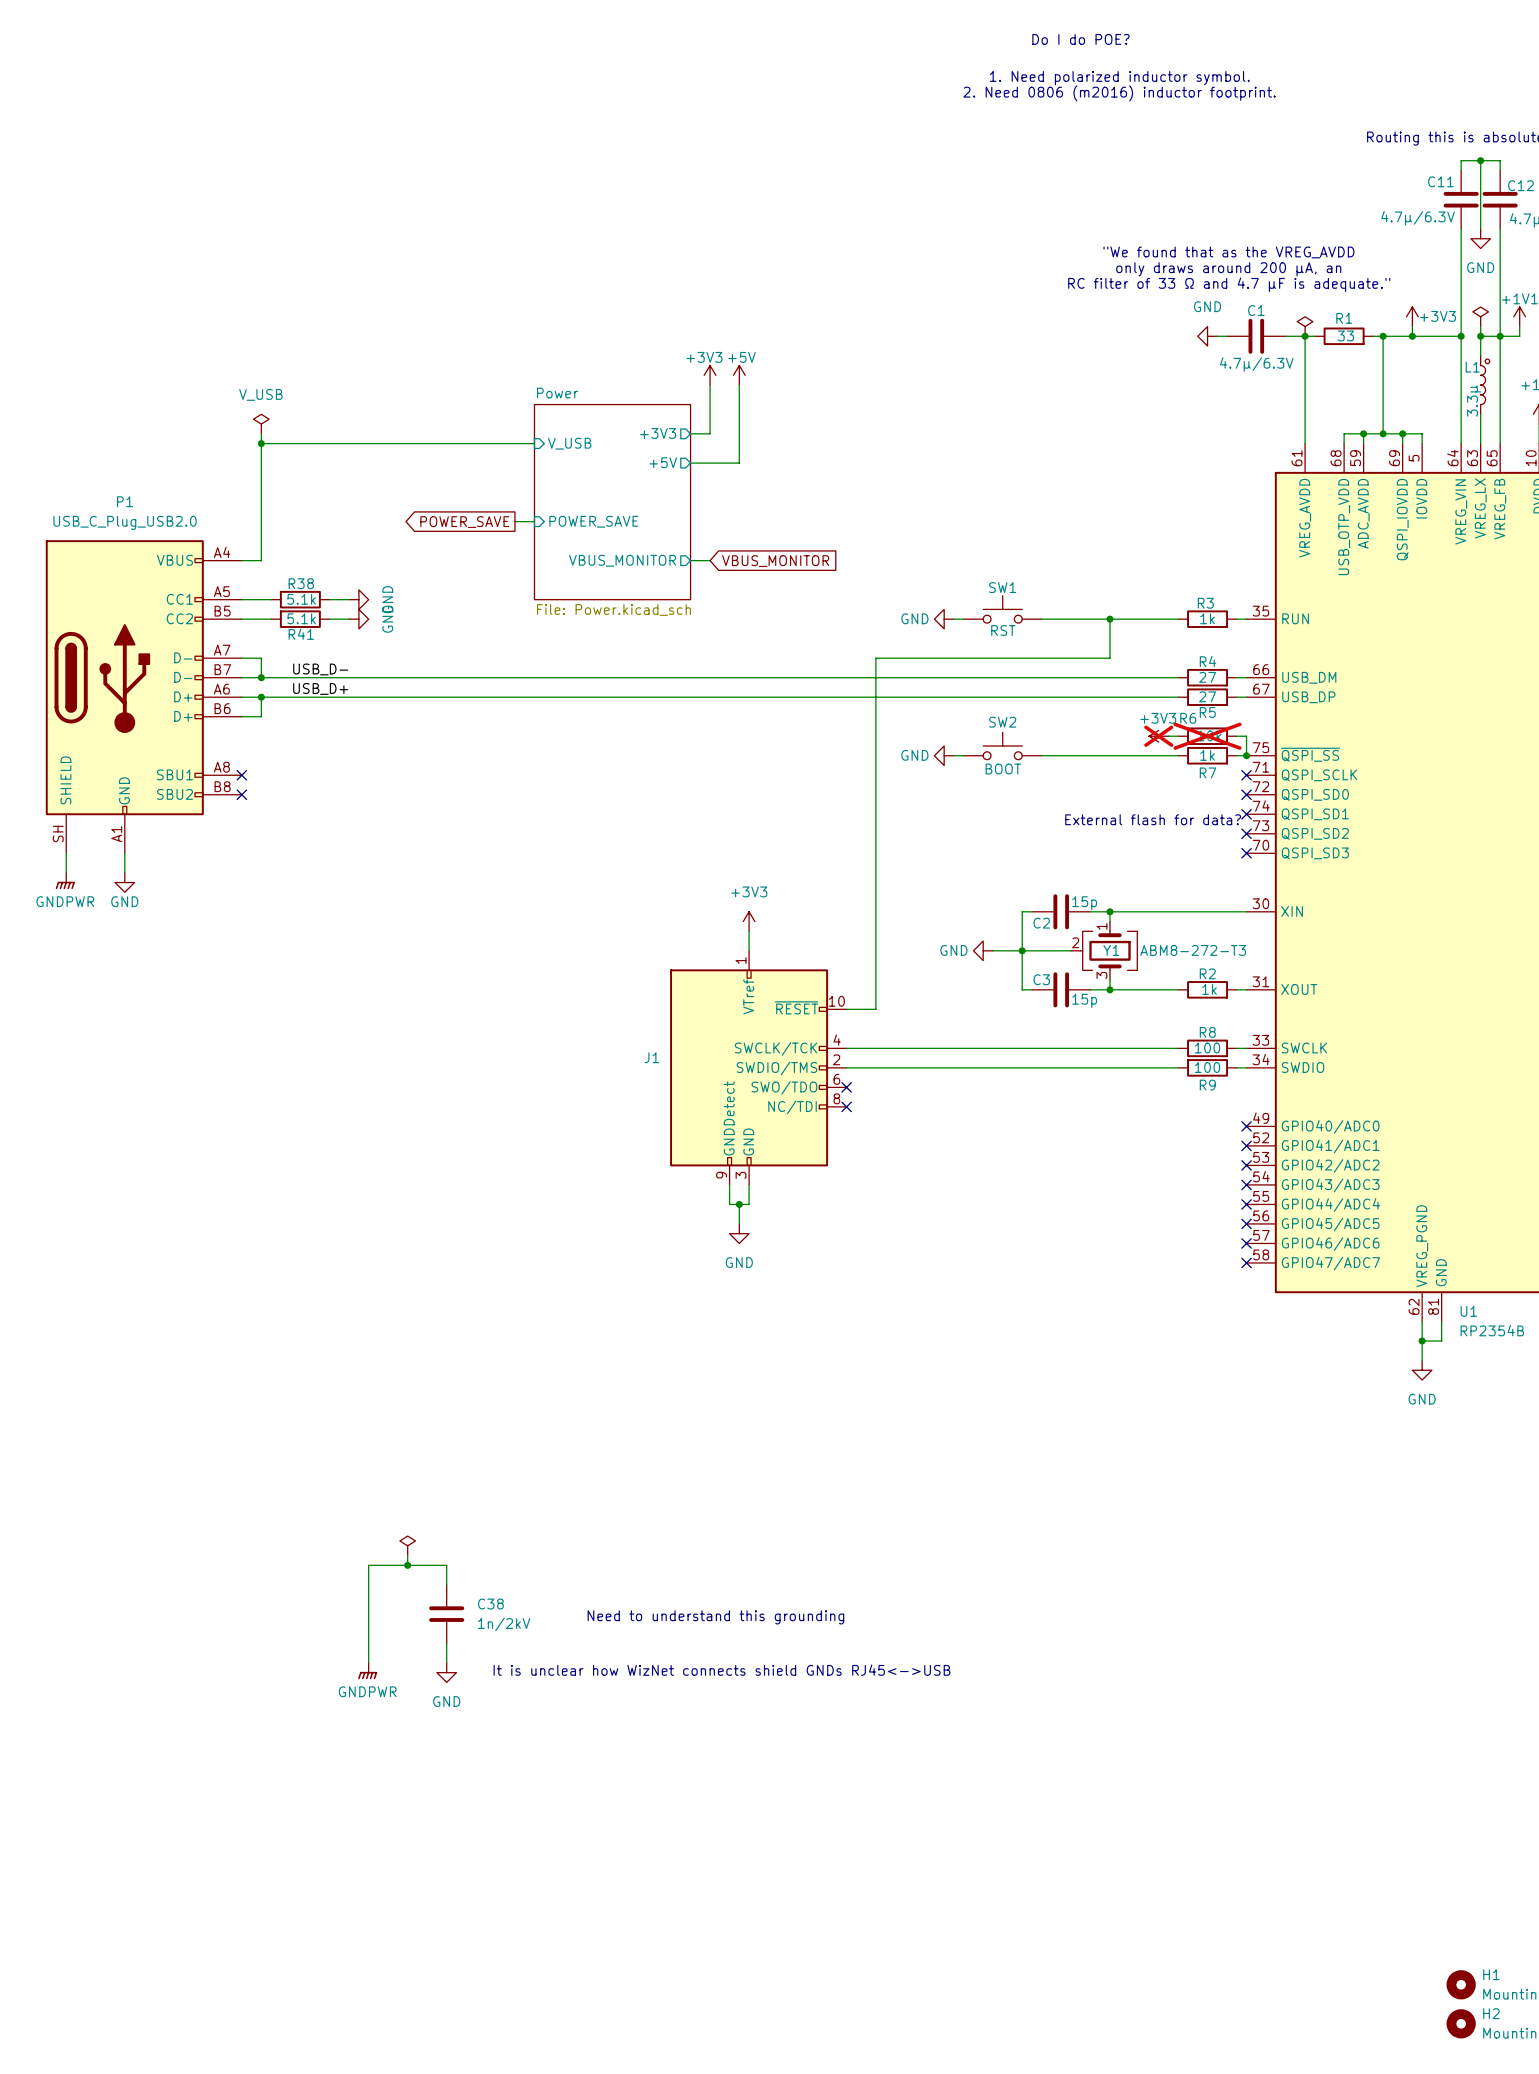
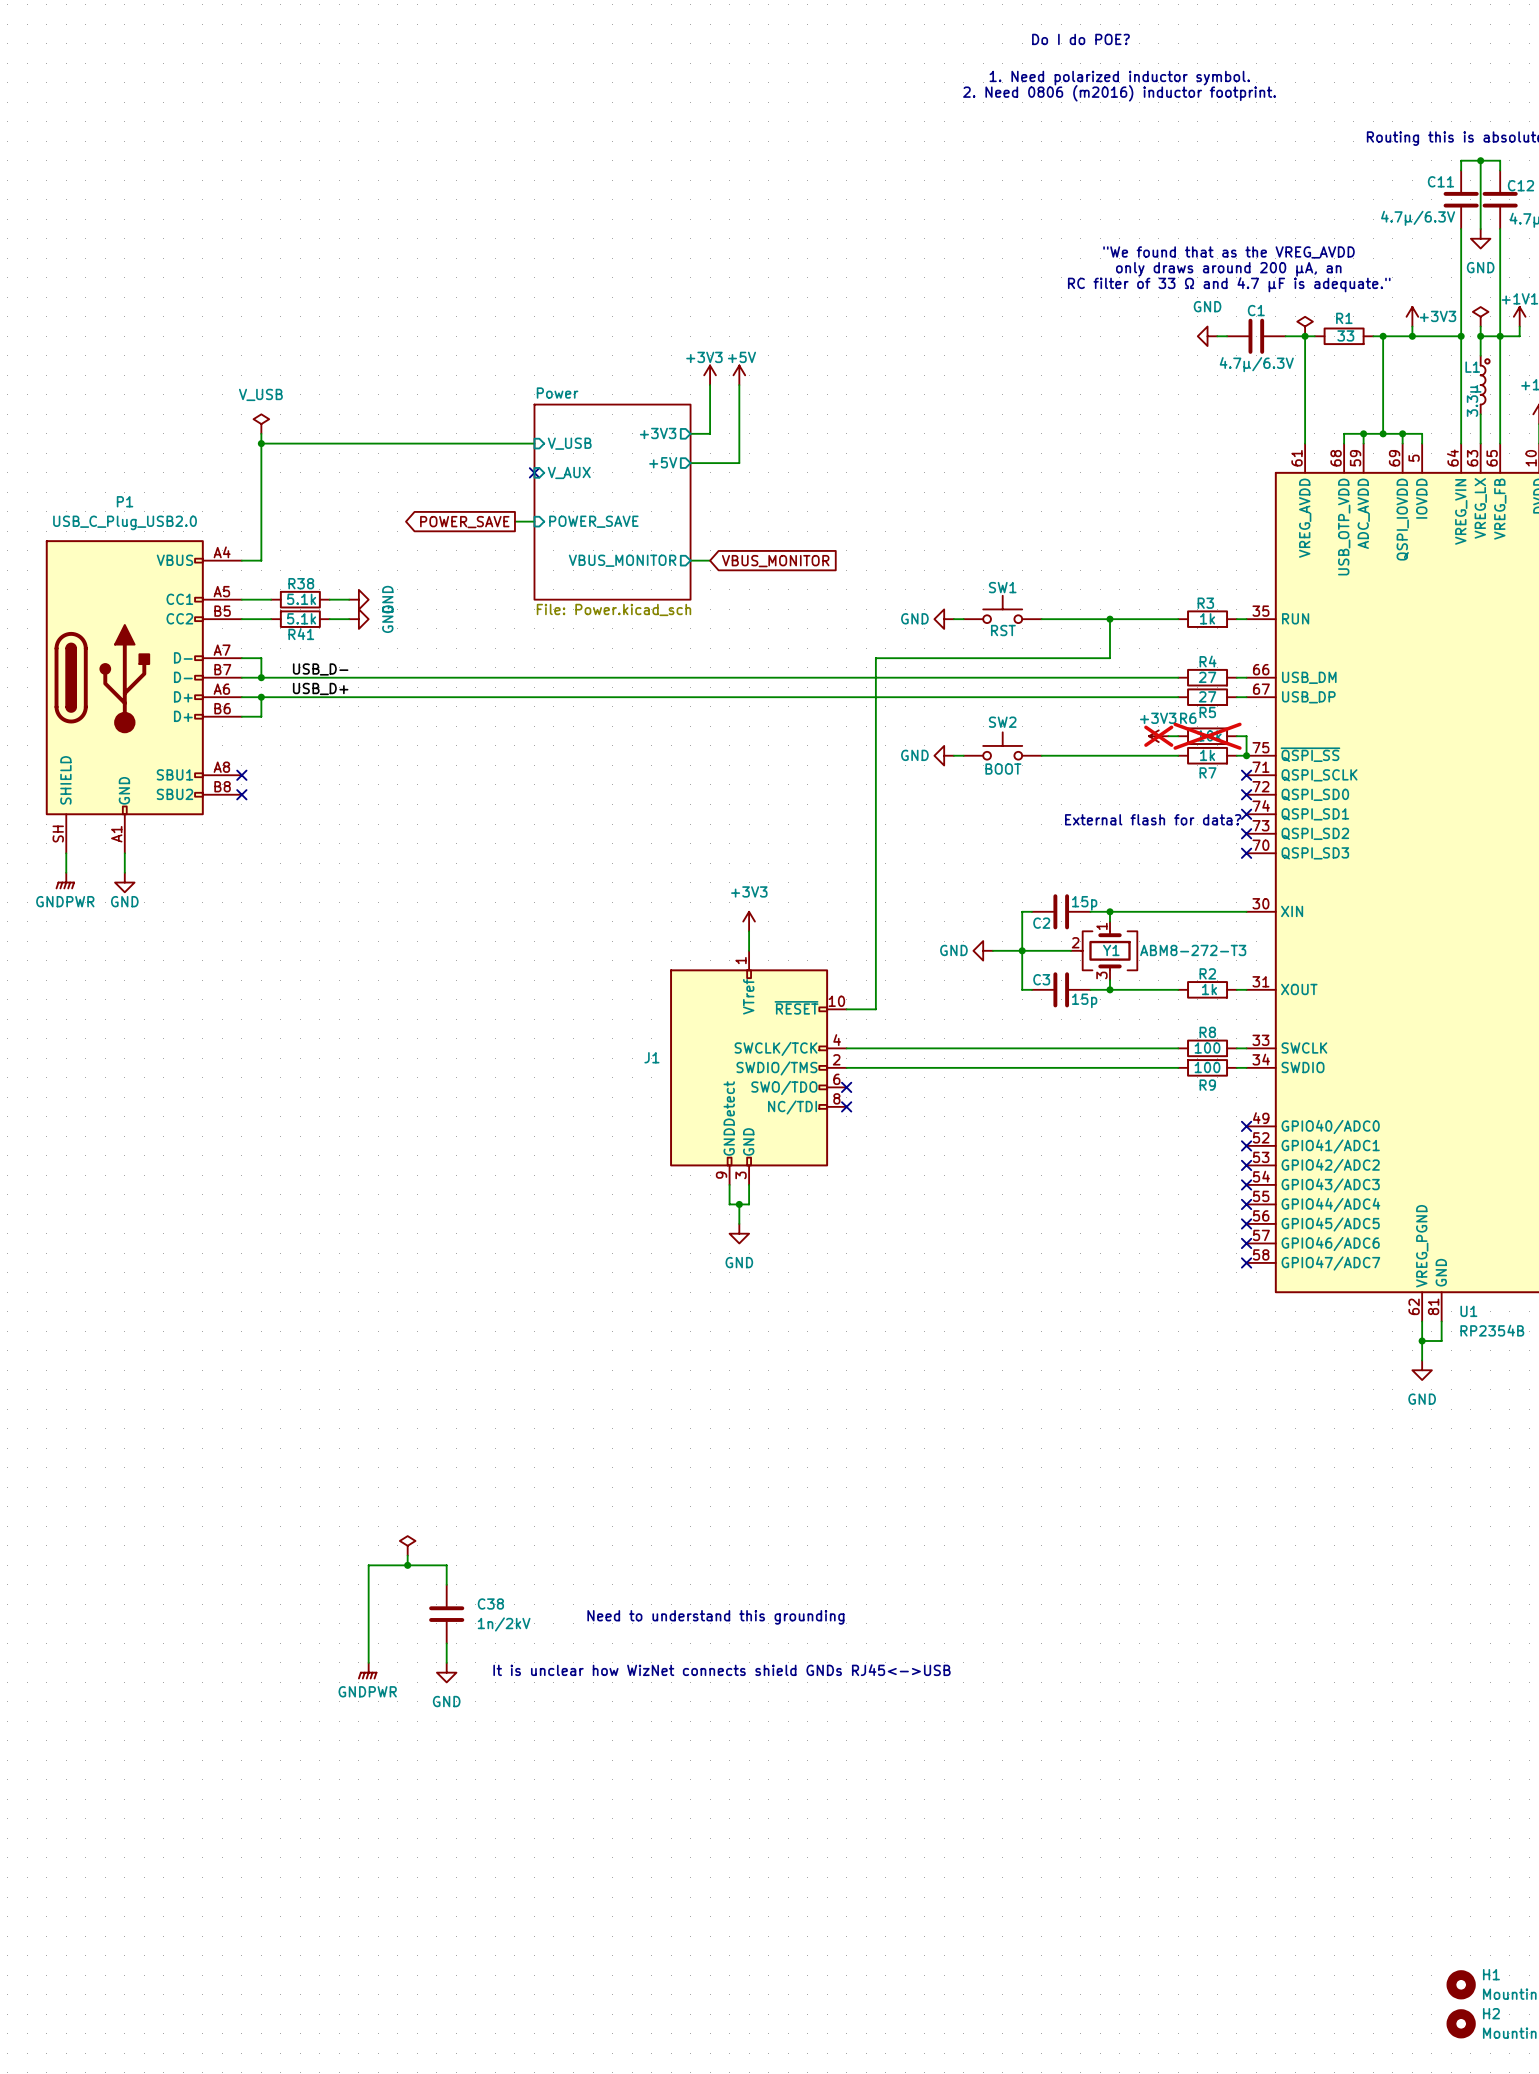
no-connect mark: none -> (534, 472)
sheet pin: none -> V_AUX (569, 472)

